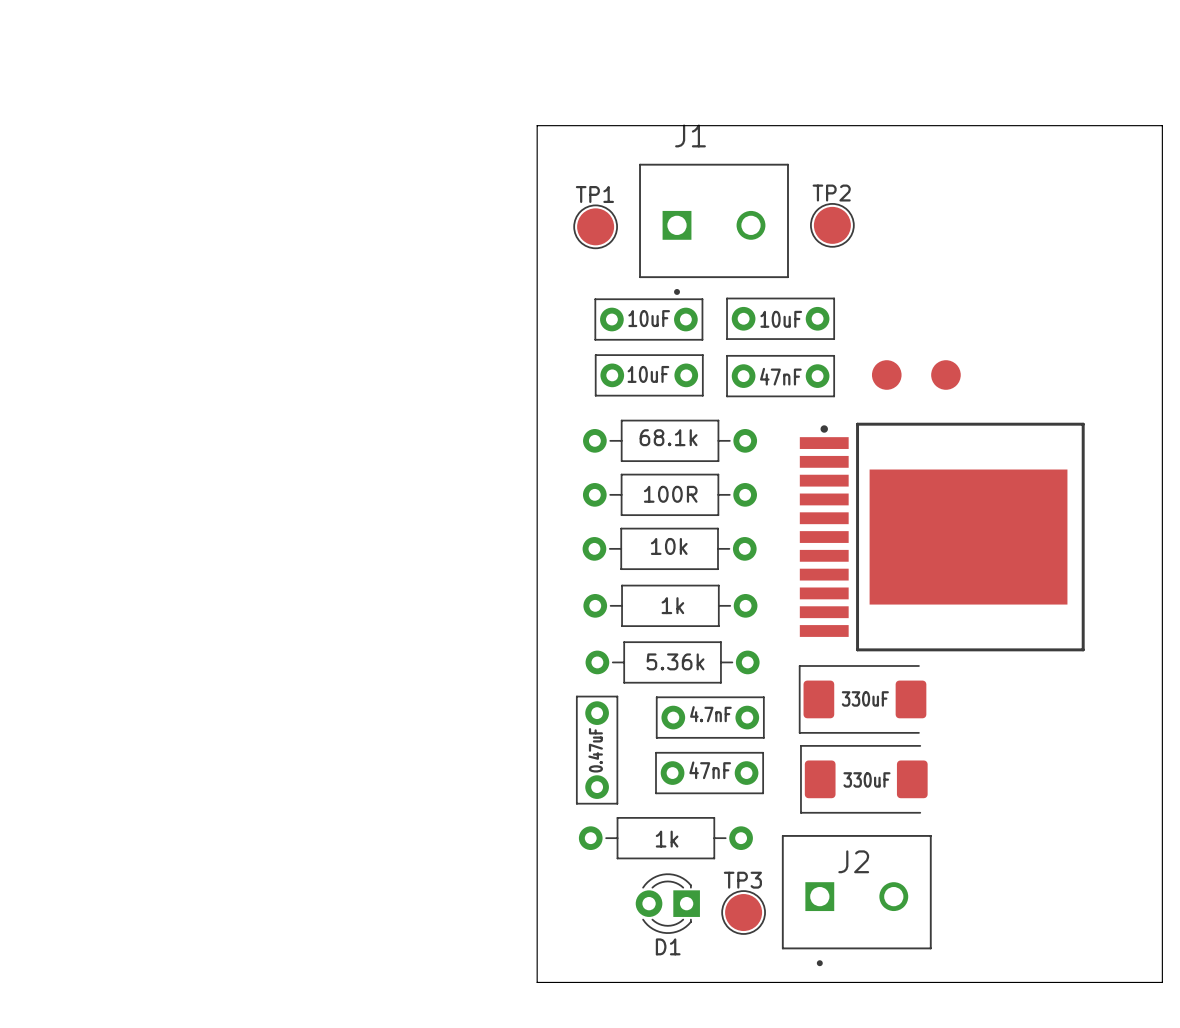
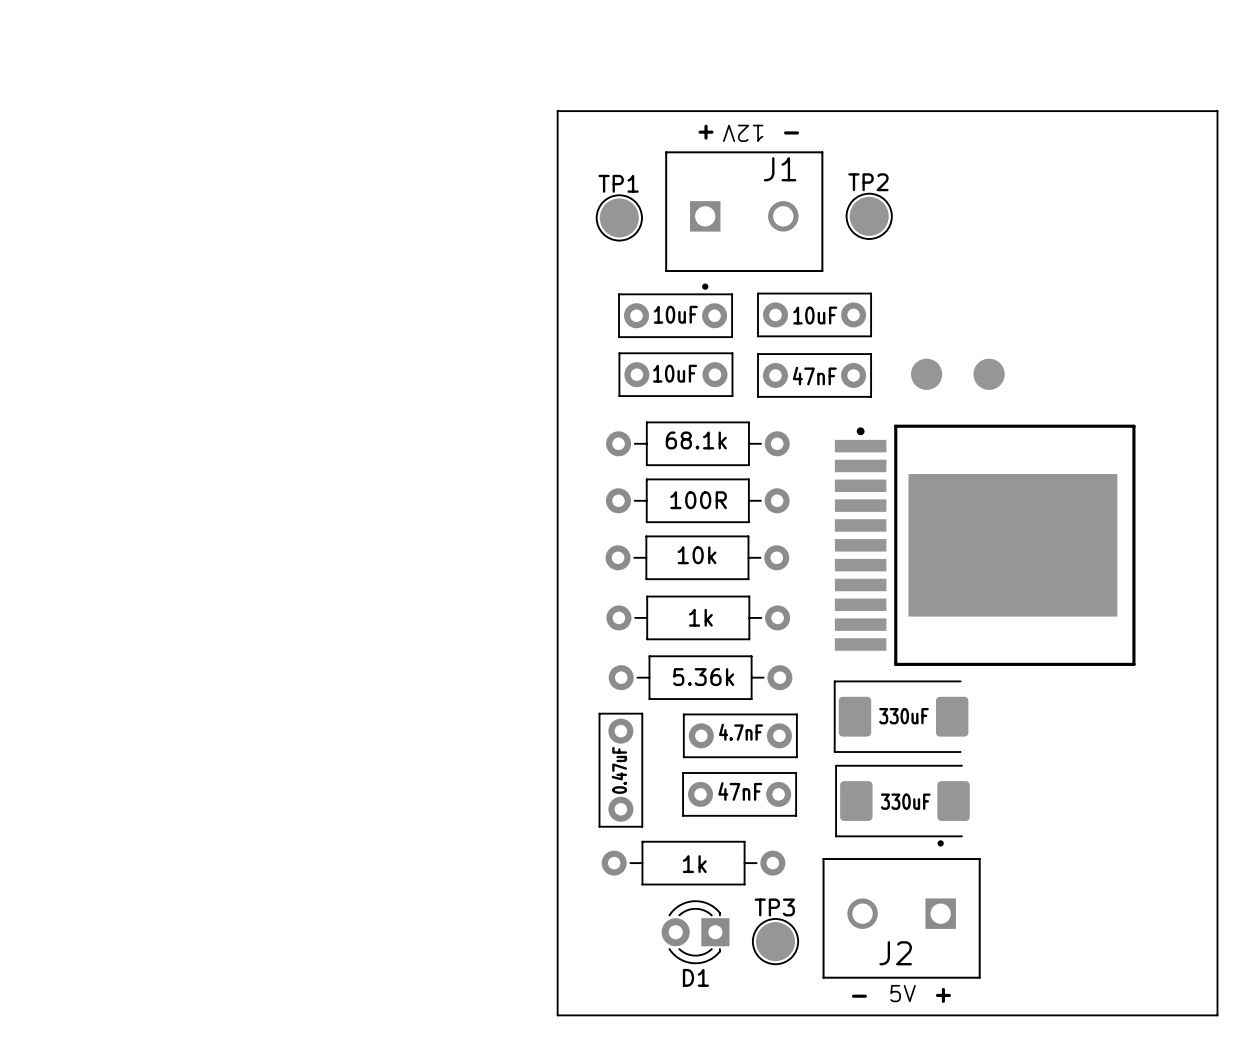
J1 name position: J1 (690, 135) -> J1 (780, 169)
text: none -> + (706, 132)
text: none -> 12V (743, 133)
text: none -> - (791, 132)
J2 rotation: 0° (856, 900) -> 180° (901, 909)
text: none -> 5V (903, 993)
text: none -> + (943, 995)
text: none -> - (859, 996)

